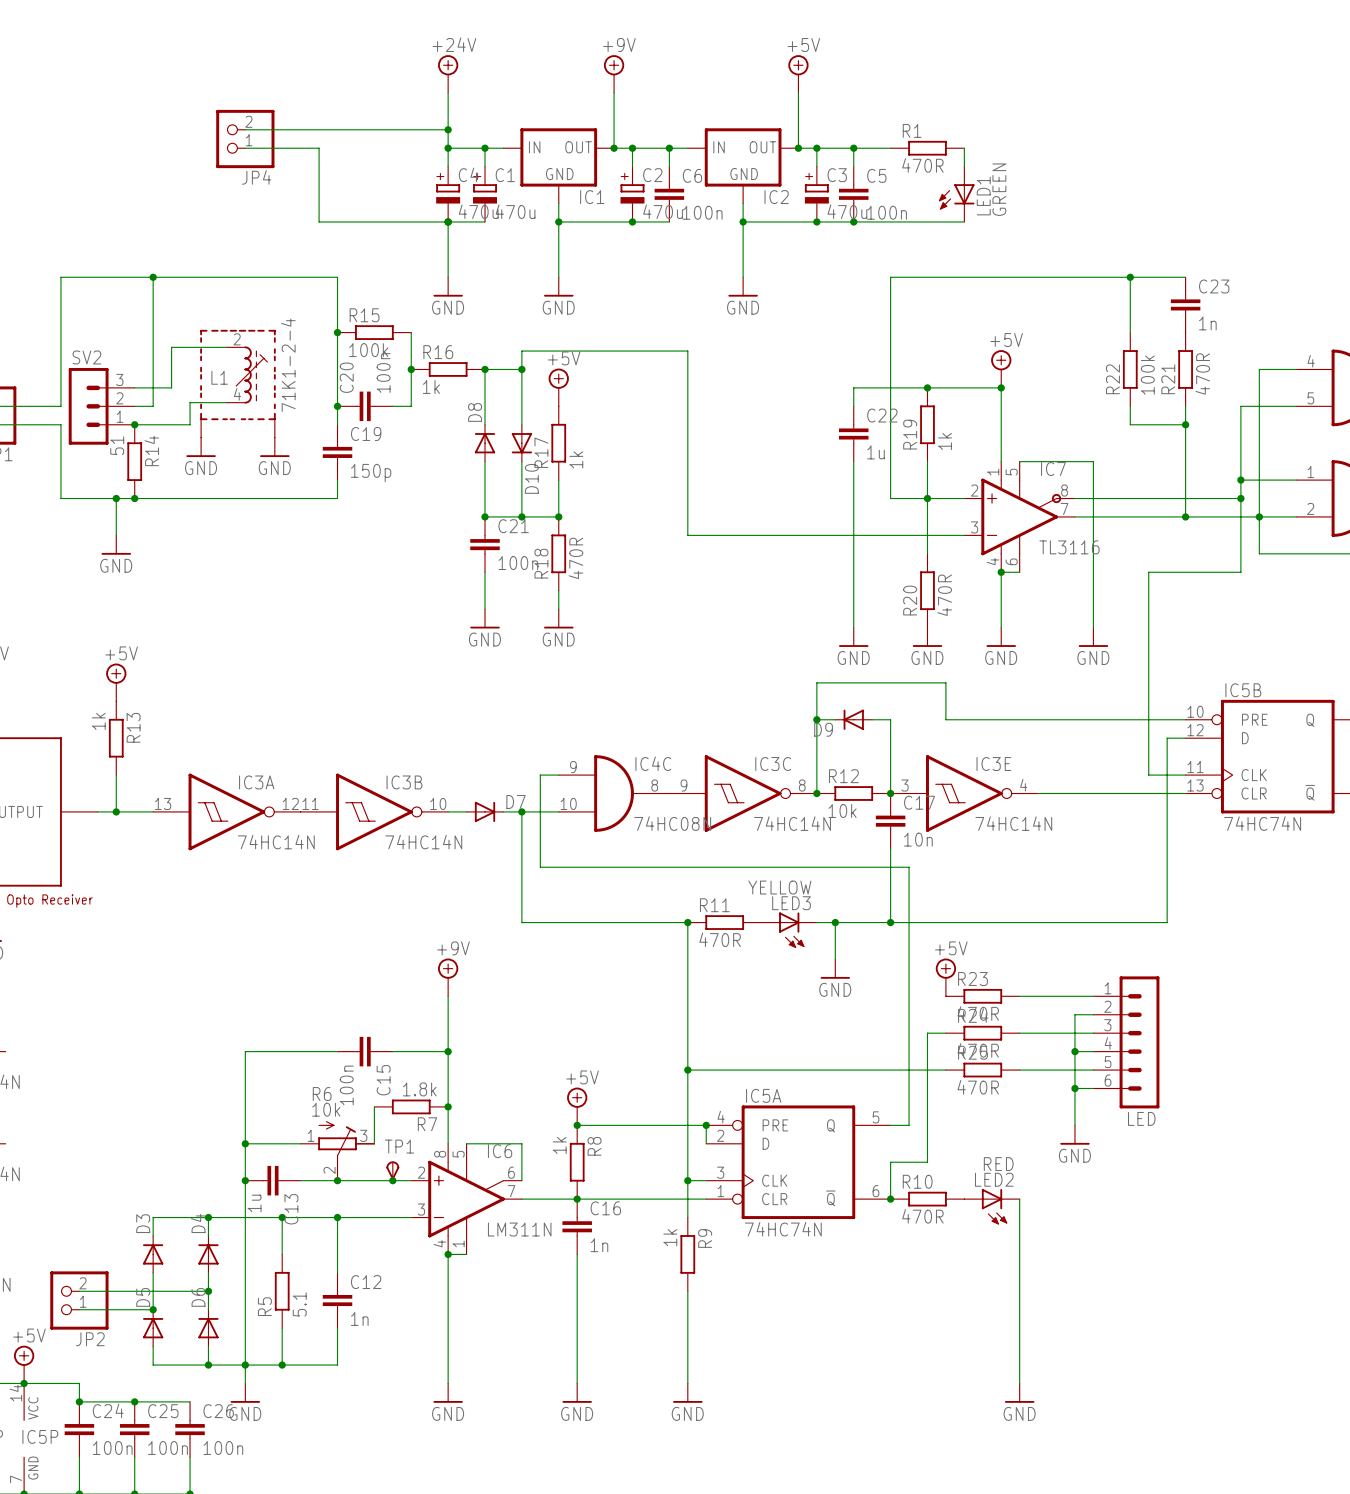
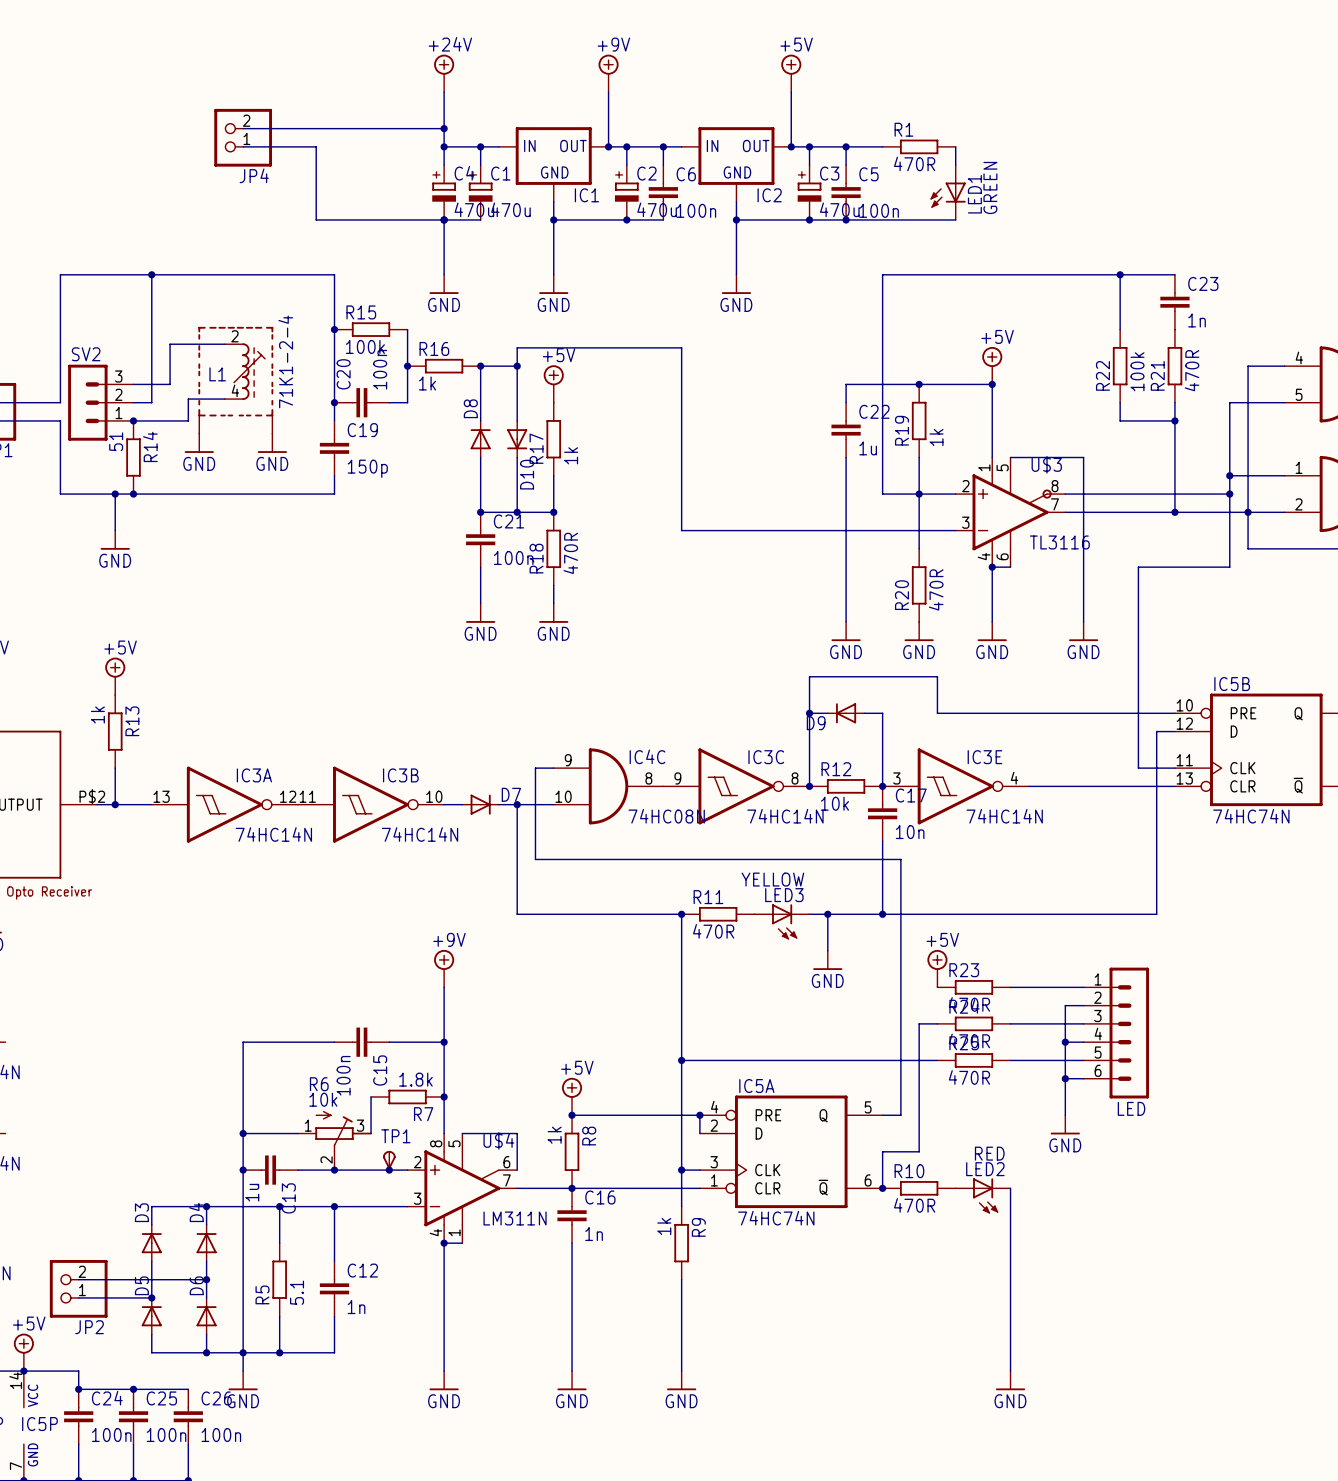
IC7 name: IC7 (1053, 469) -> U$3 (1046, 464)
part pin number: none -> P$2 (92, 796)
IC6 name: IC6 (500, 1151) -> U$4 (498, 1140)

